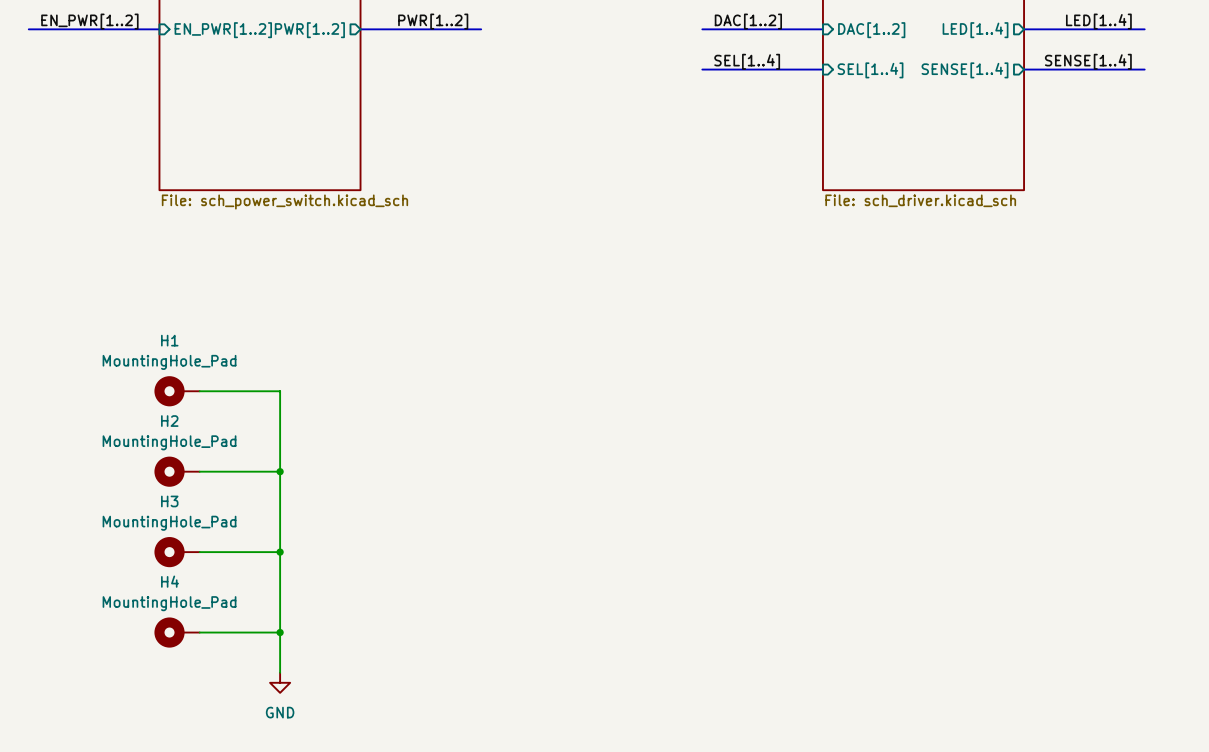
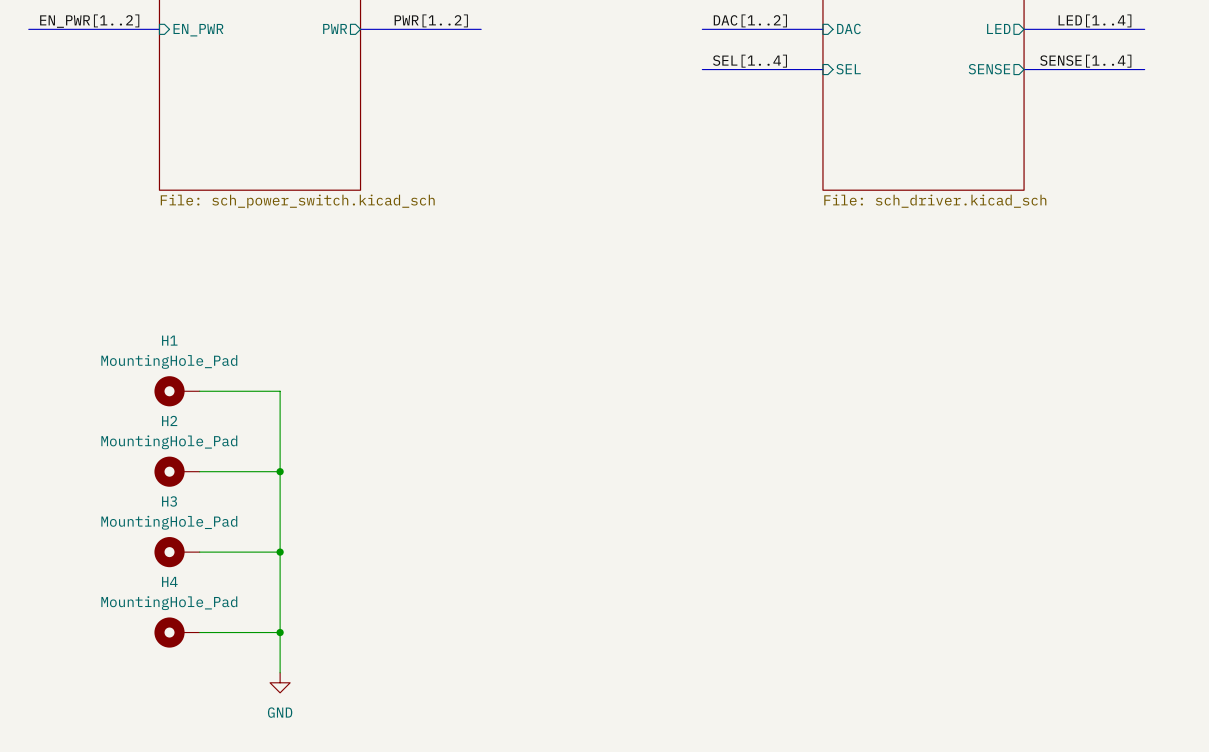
sheet pin: EN_PWR[1..2] (223, 30) -> EN_PWR (198, 30)
sheet pin: PWR[1..2] (309, 30) -> PWR (335, 28)
sheet pin: DAC[1..2] (871, 30) -> DAC (848, 28)
sheet pin: LED[1..4] (975, 30) -> LED (998, 28)
sheet pin: SEL[1..4] (870, 70) -> SEL (848, 69)
sheet pin: SENSE[1..4] (965, 70) -> SENSE (989, 69)

